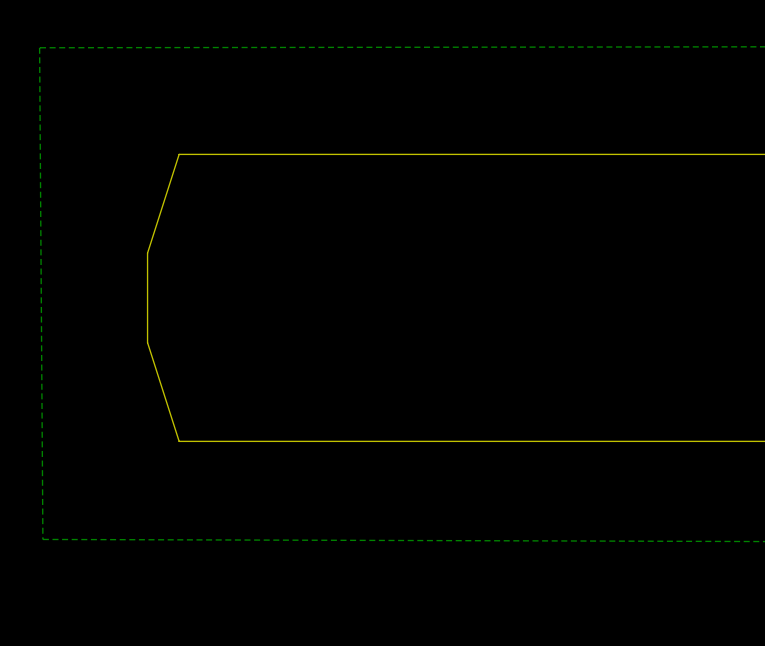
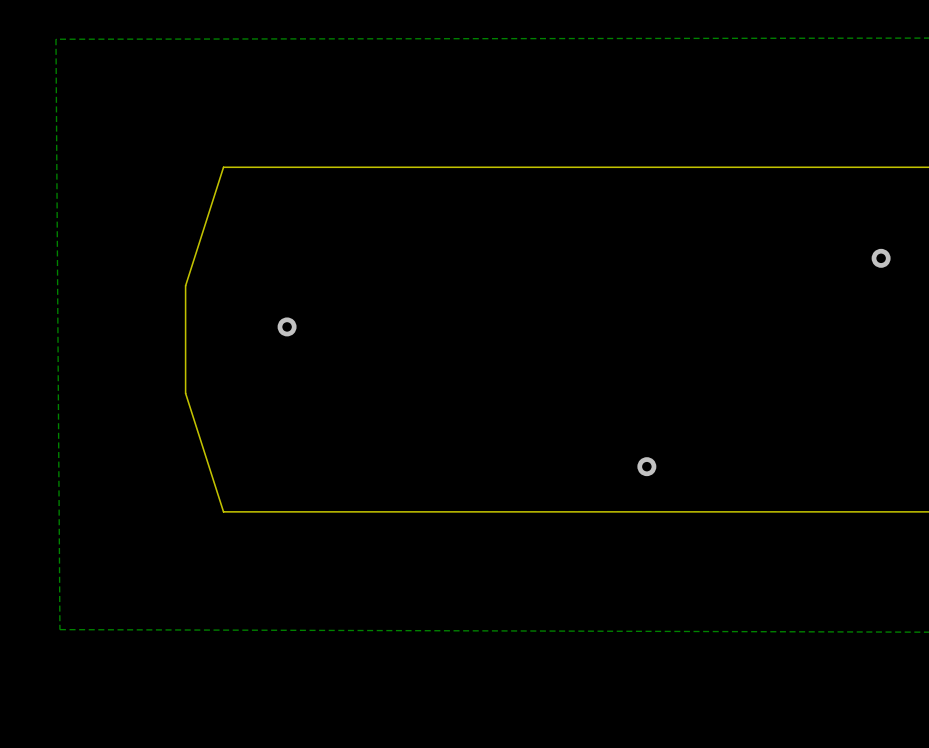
via: none -> (881, 258)
via: none -> (287, 326)
via: none -> (646, 466)

